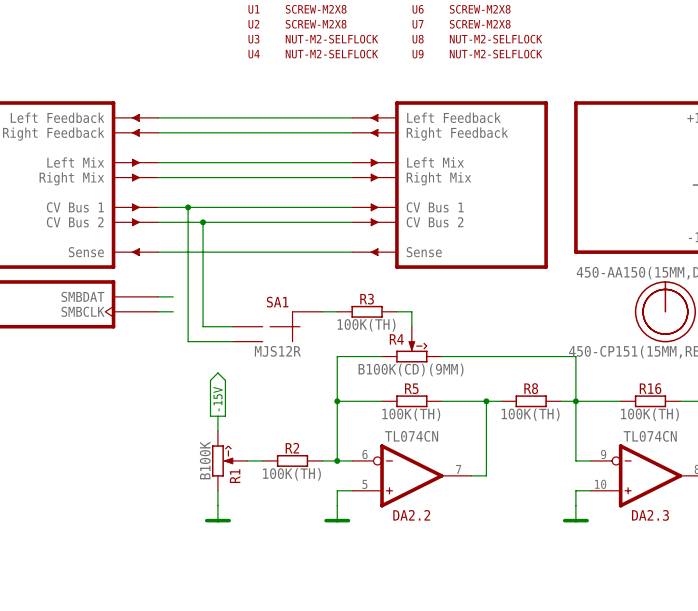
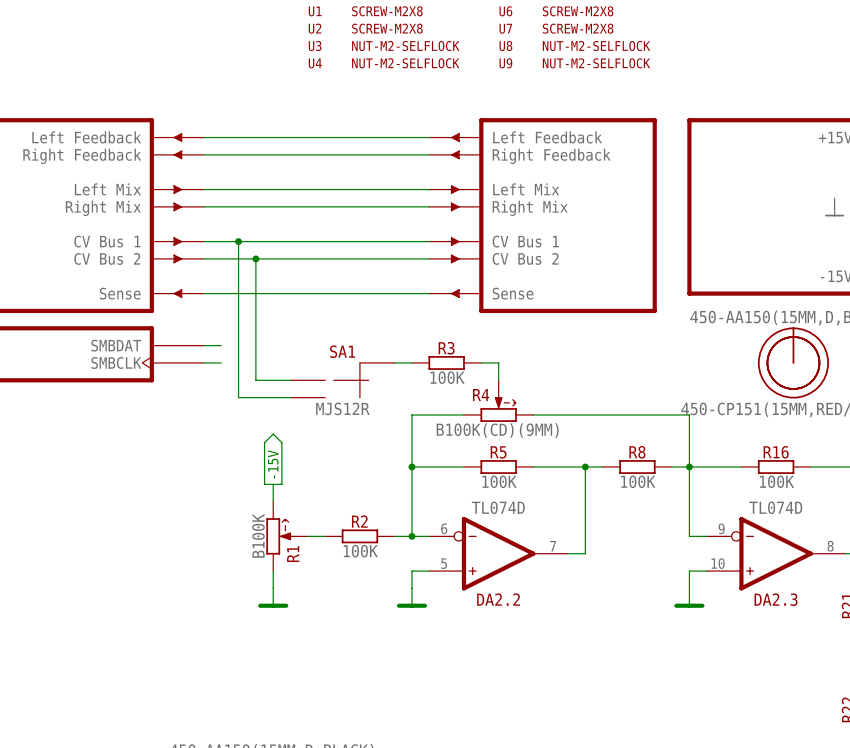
R3 value: 100K(TH) (366, 325) -> 100K (447, 377)
R5 value: 100K(TH) (411, 414) -> 100K (499, 481)
R8 value: 100K(TH) (530, 414) -> 100K (638, 481)
R16 value: 100K(TH) (649, 414) -> 100K (776, 481)
DA2.2 value: TL074CN (411, 436) -> TL074D (498, 507)
DA2.3 value: TL074CN (650, 436) -> TL074D (775, 507)
R2 value: 100K(TH) (291, 474) -> 100K (360, 551)

